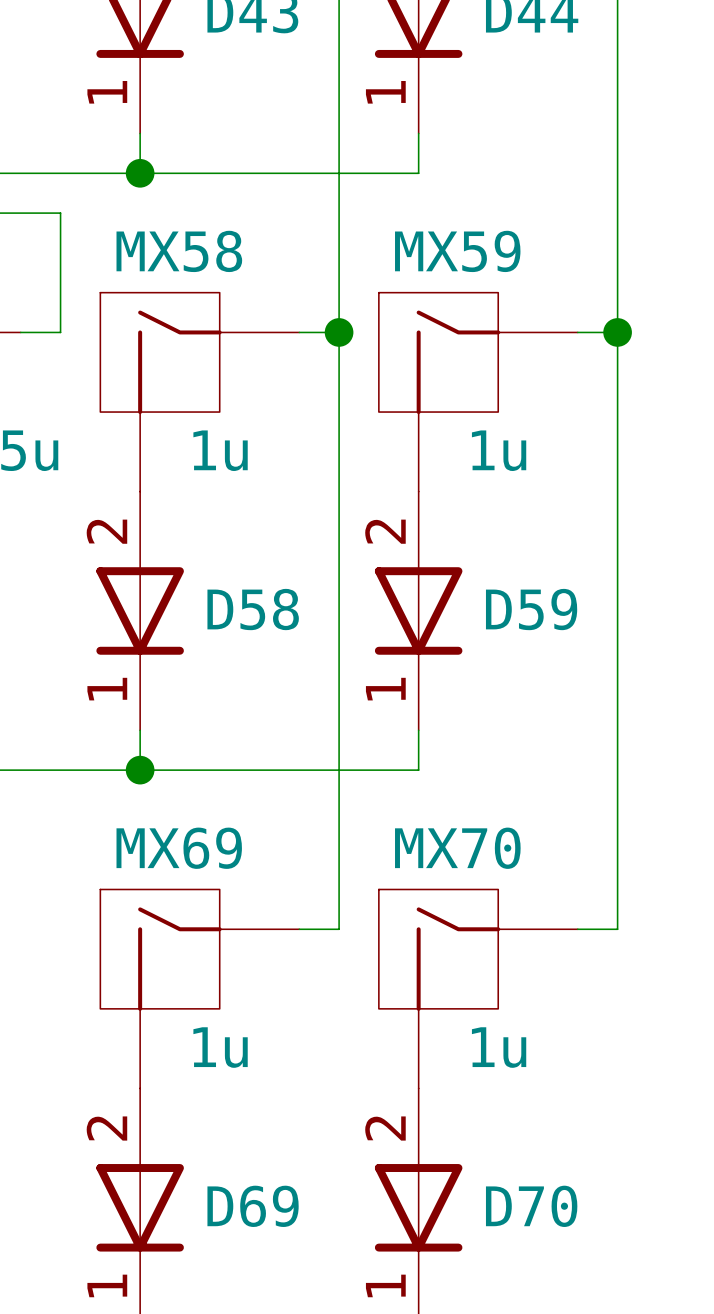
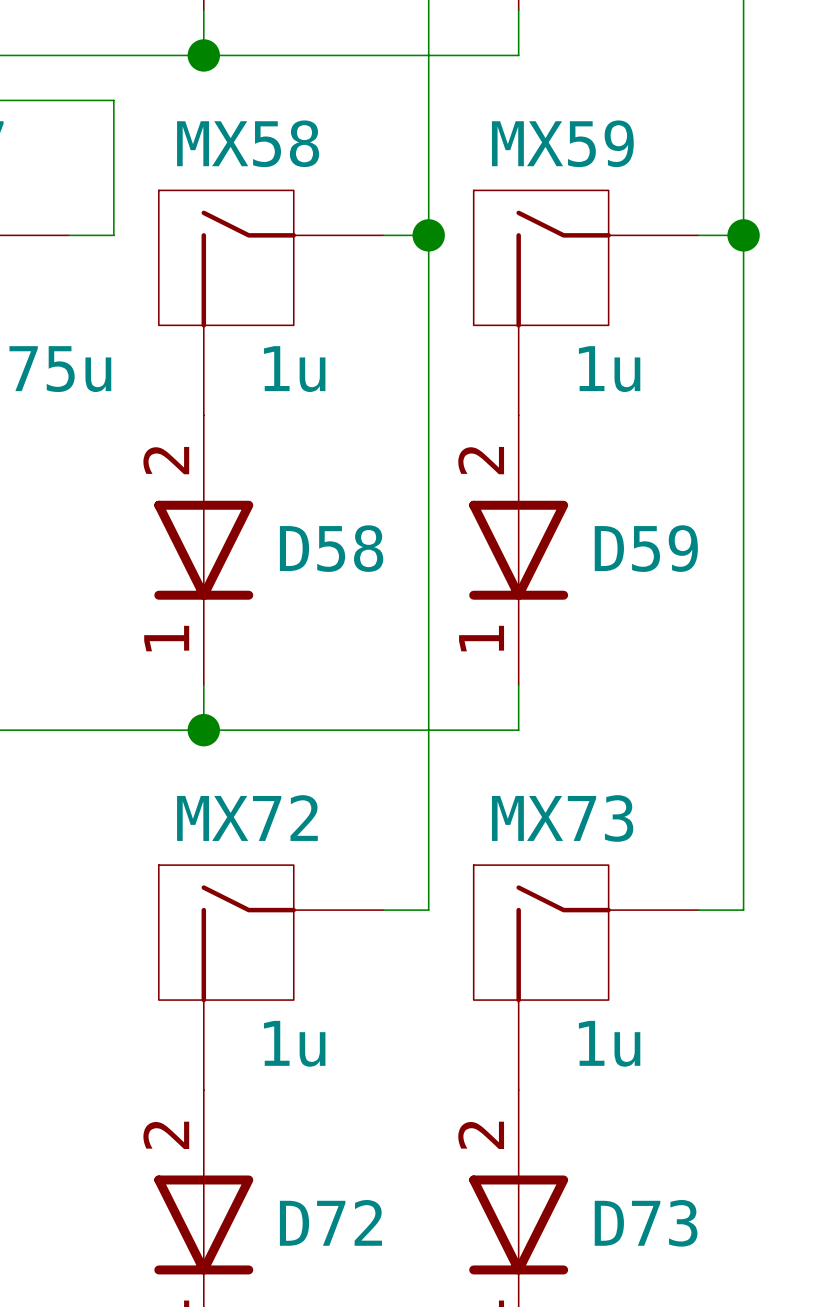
MX69 name: MX69 (179, 848) -> MX72 (247, 818)
MX70 name: MX70 (457, 848) -> MX73 (562, 818)
D69 name: D69 (253, 1206) -> D72 (330, 1222)
D70 name: D70 (531, 1206) -> D73 (646, 1223)

